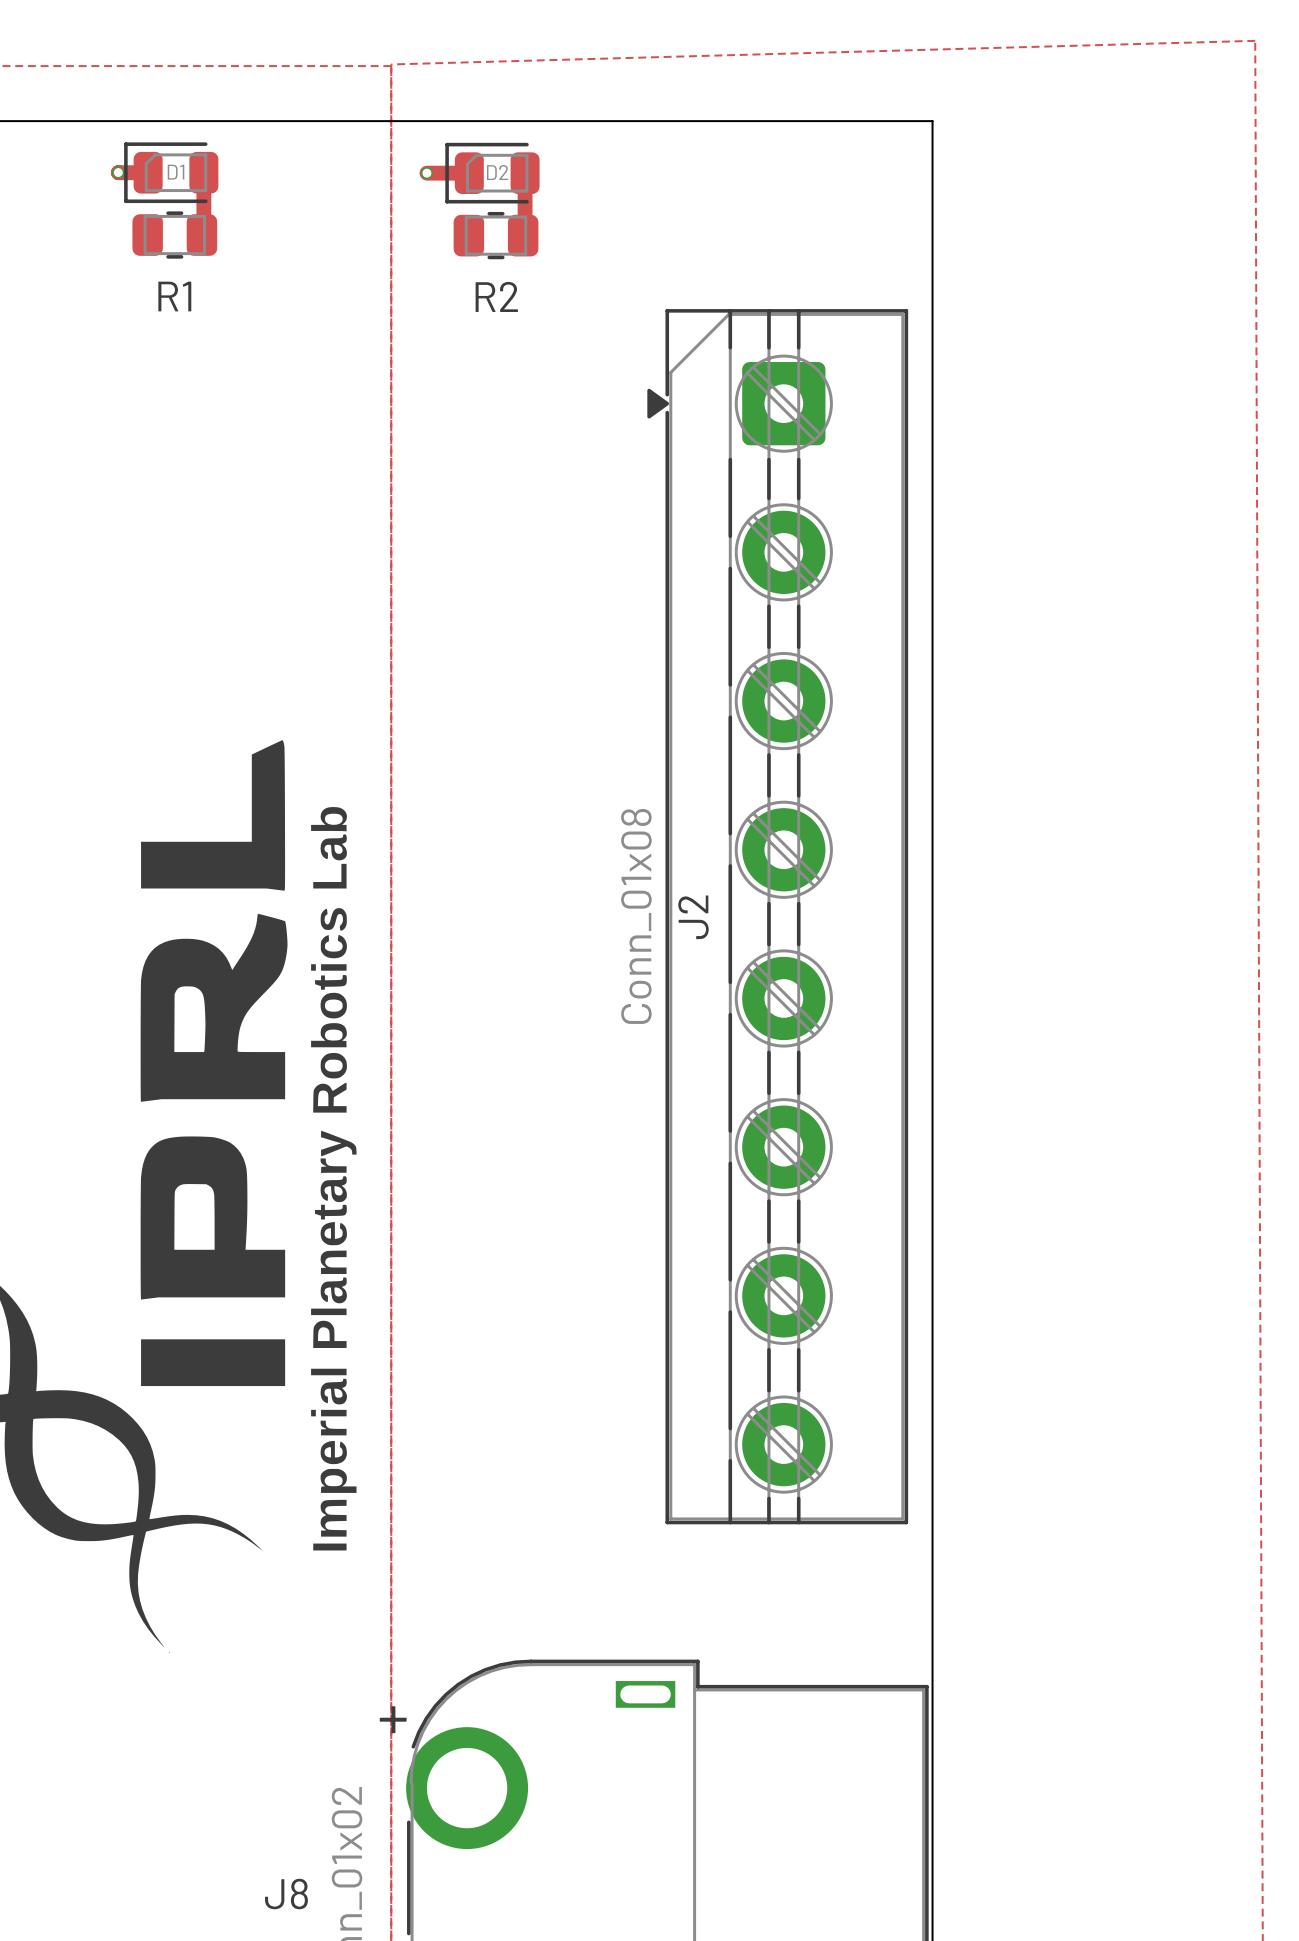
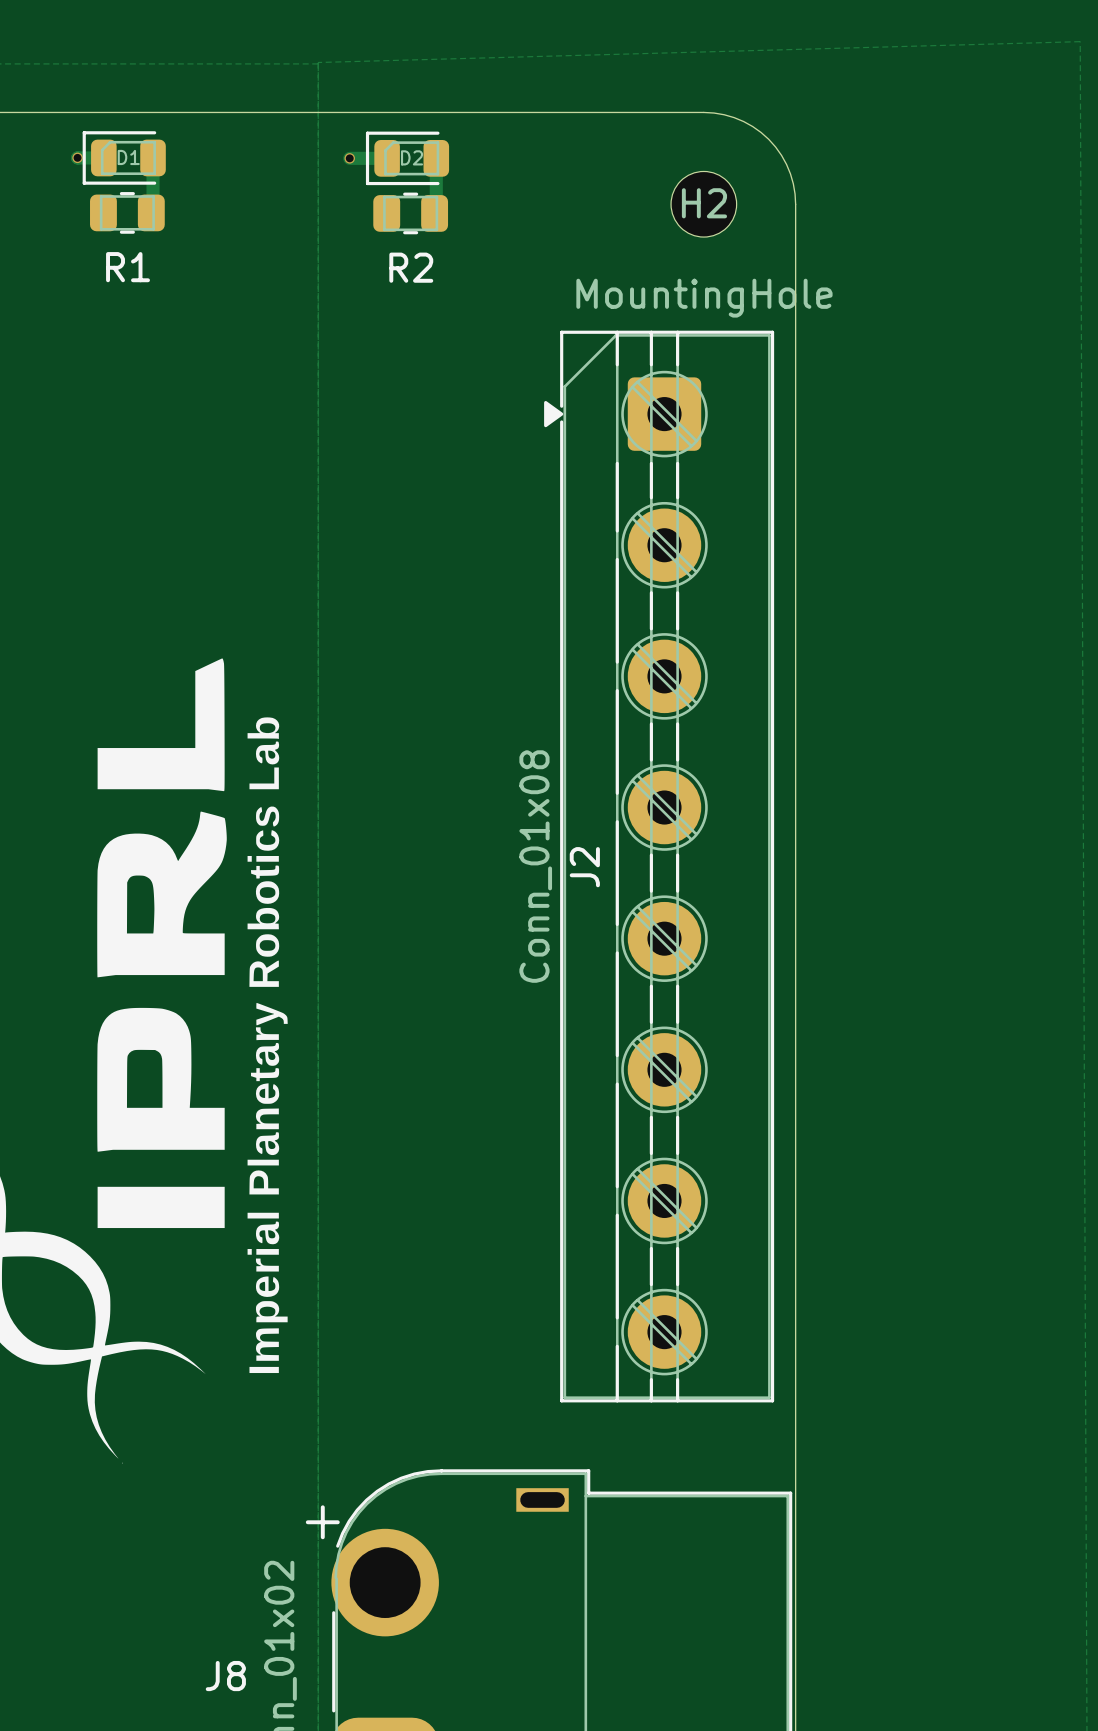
board edge: (828, 121) (932, 121) (932, 225) -> (703, 112) (734, 117) (752, 126) (768, 139) (781, 155) (790, 173) (795, 204)
H2: none -> MountingHole (703, 204)
J2 position: (777, 916) -> (659, 866)

